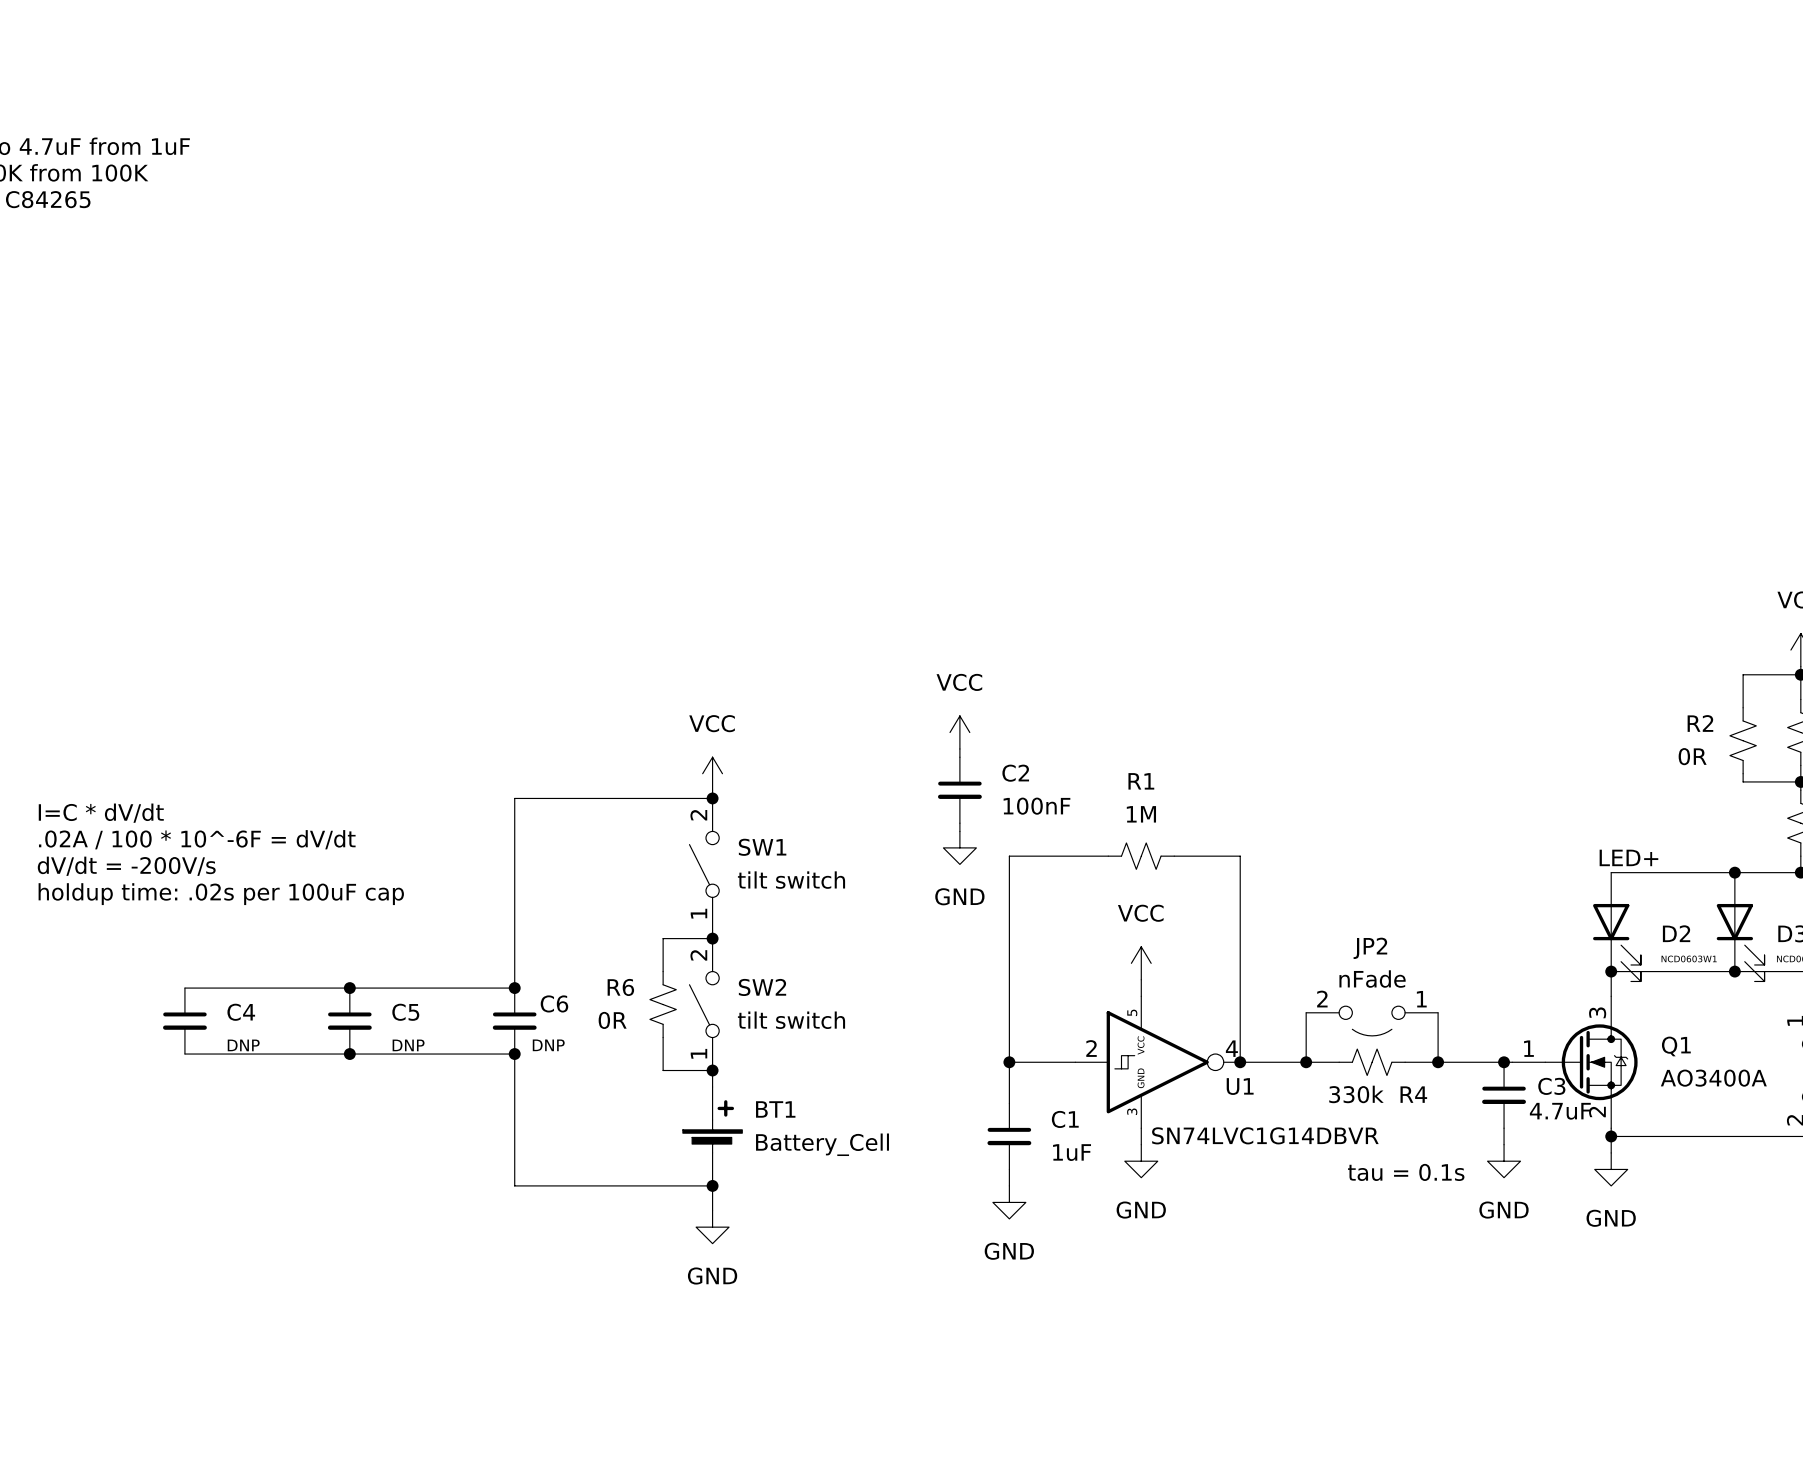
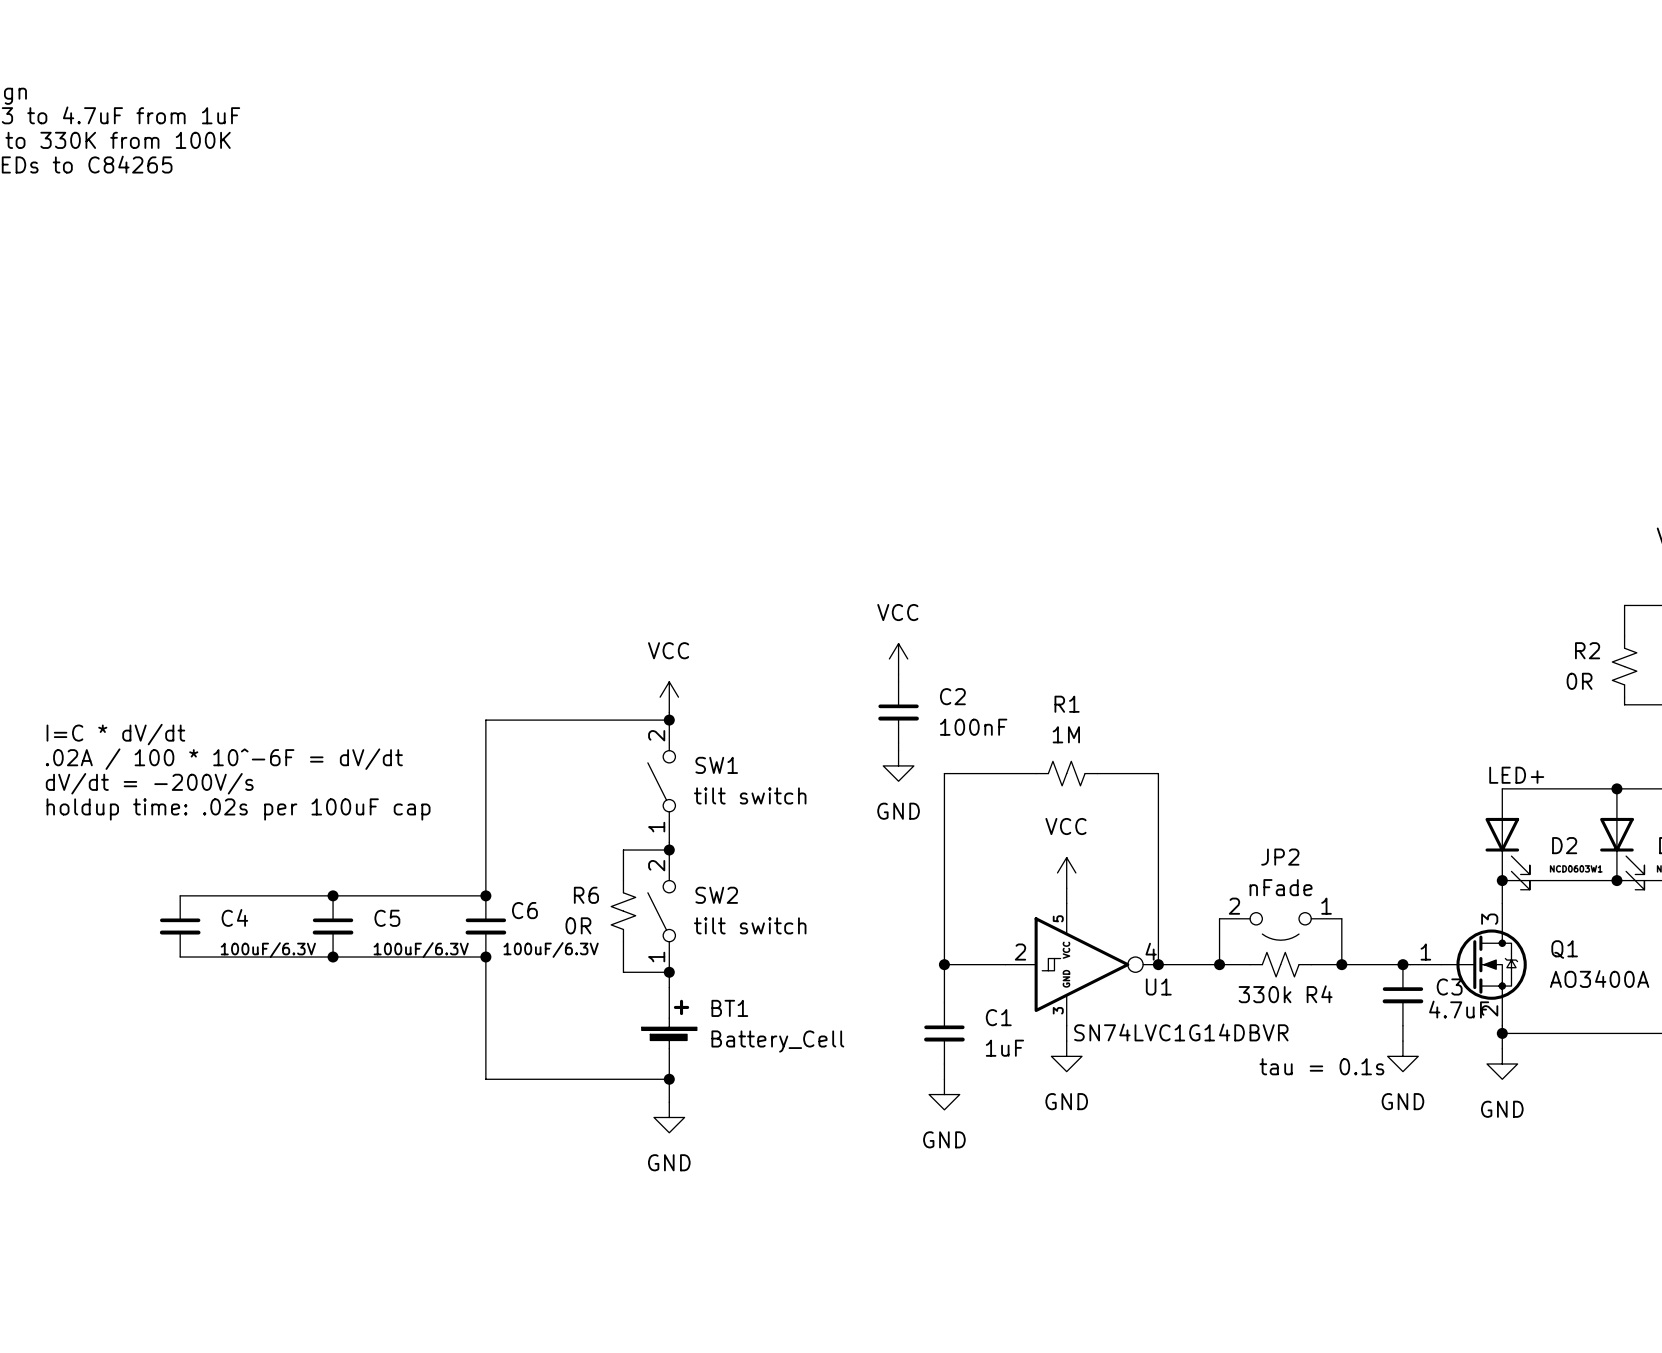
C4 value: DNP (243, 1045) -> 100uF/6.3V (268, 950)
C5 value: DNP (408, 1045) -> 100uF/6.3V (421, 950)
C6 value: DNP (548, 1045) -> 100uF/6.3V (551, 949)

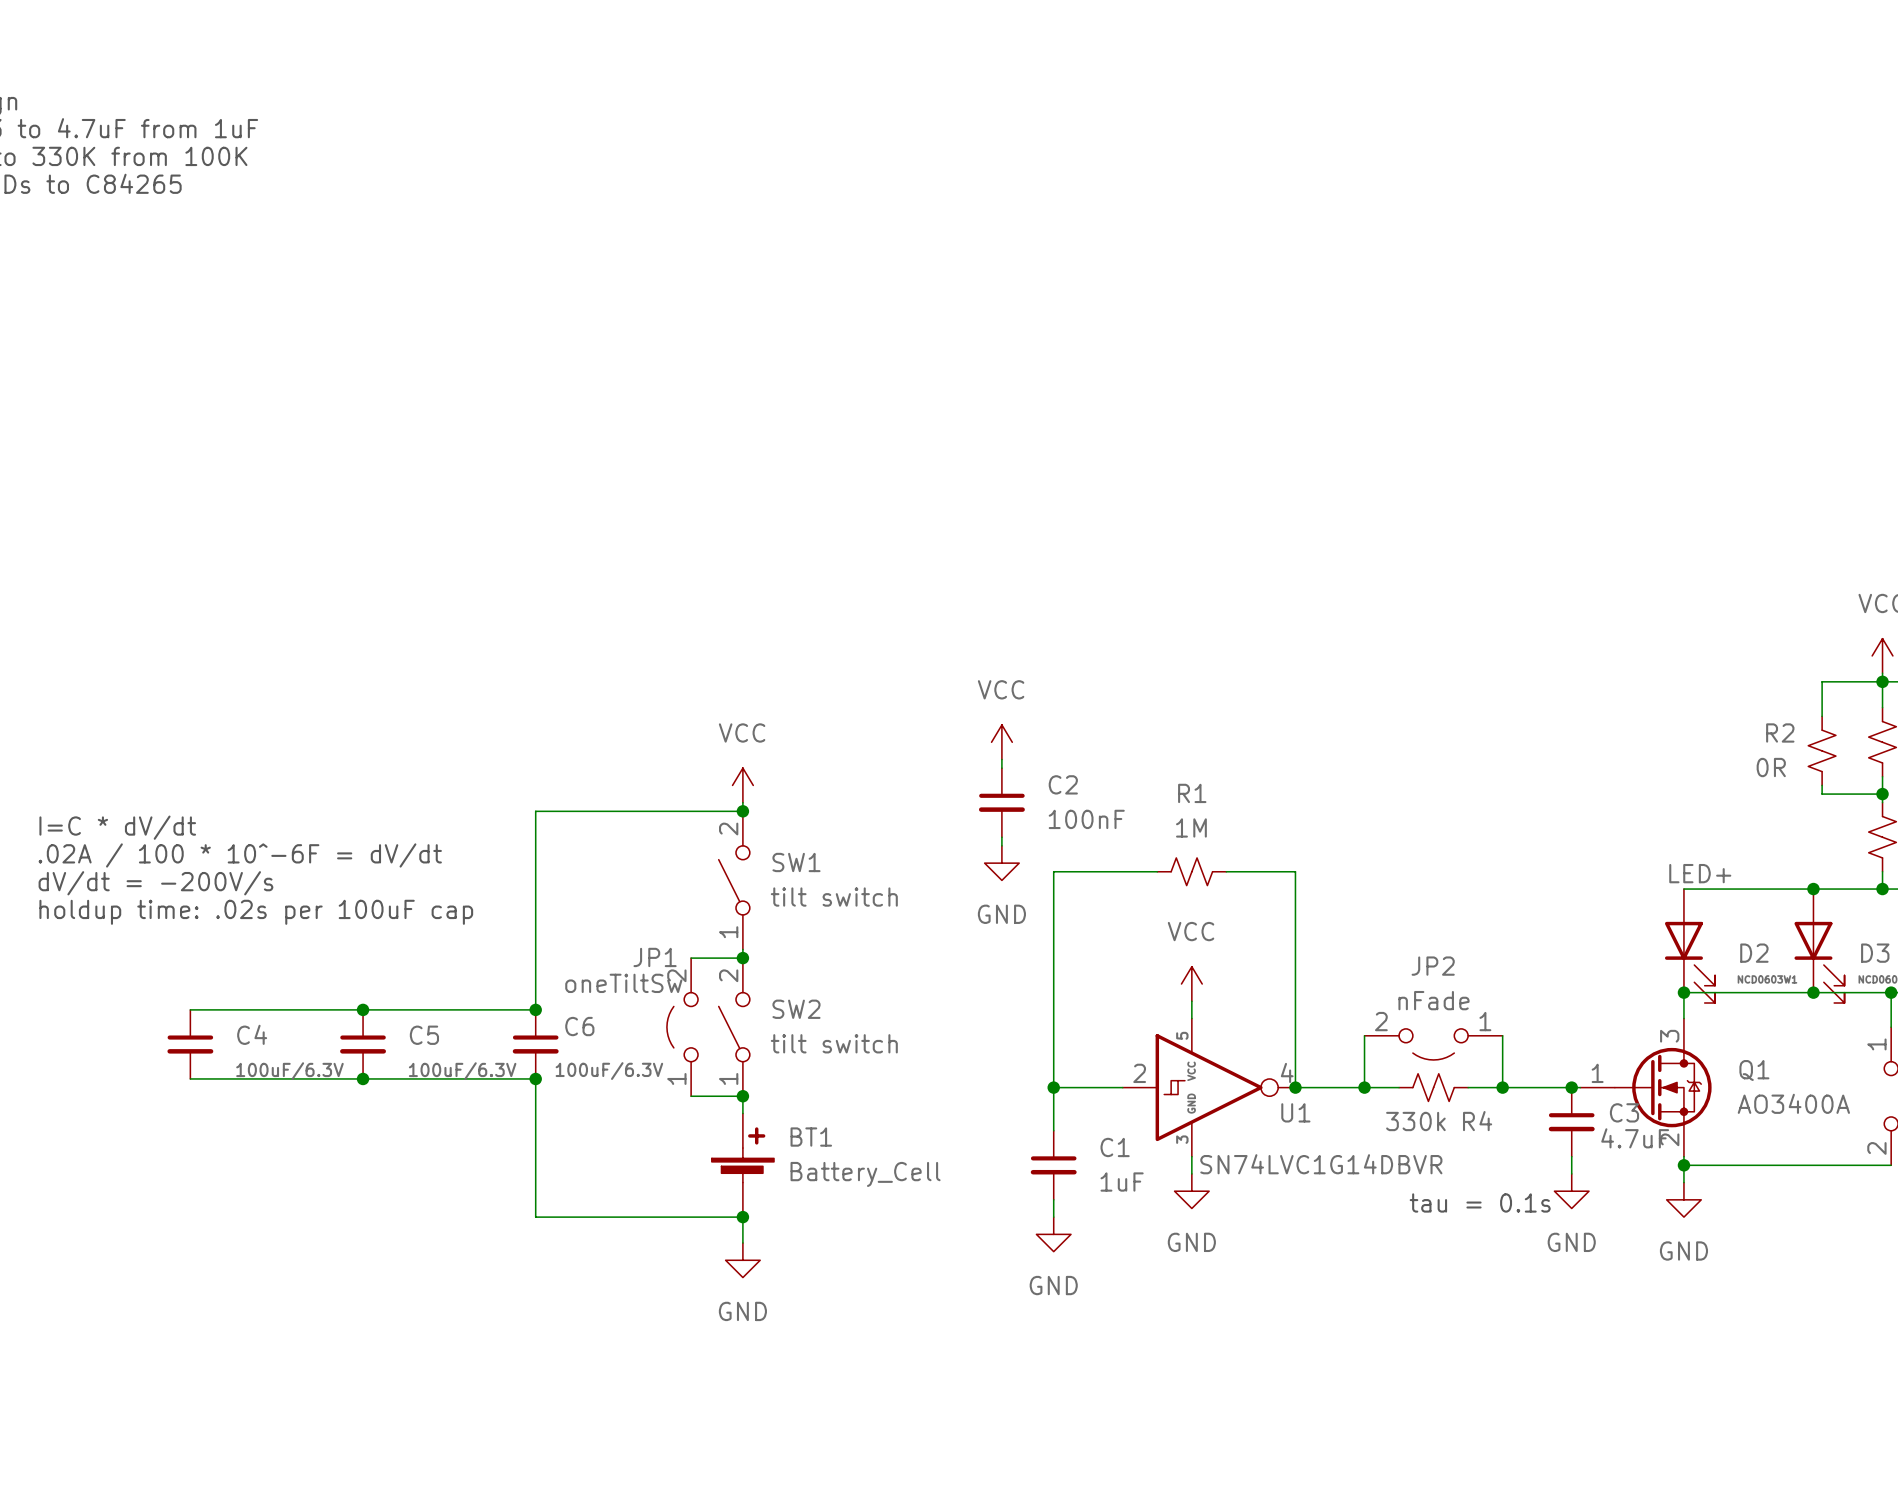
JP1: none -> oneTiltSw (682, 1027)
R6: 0R (623, 911) -> none

